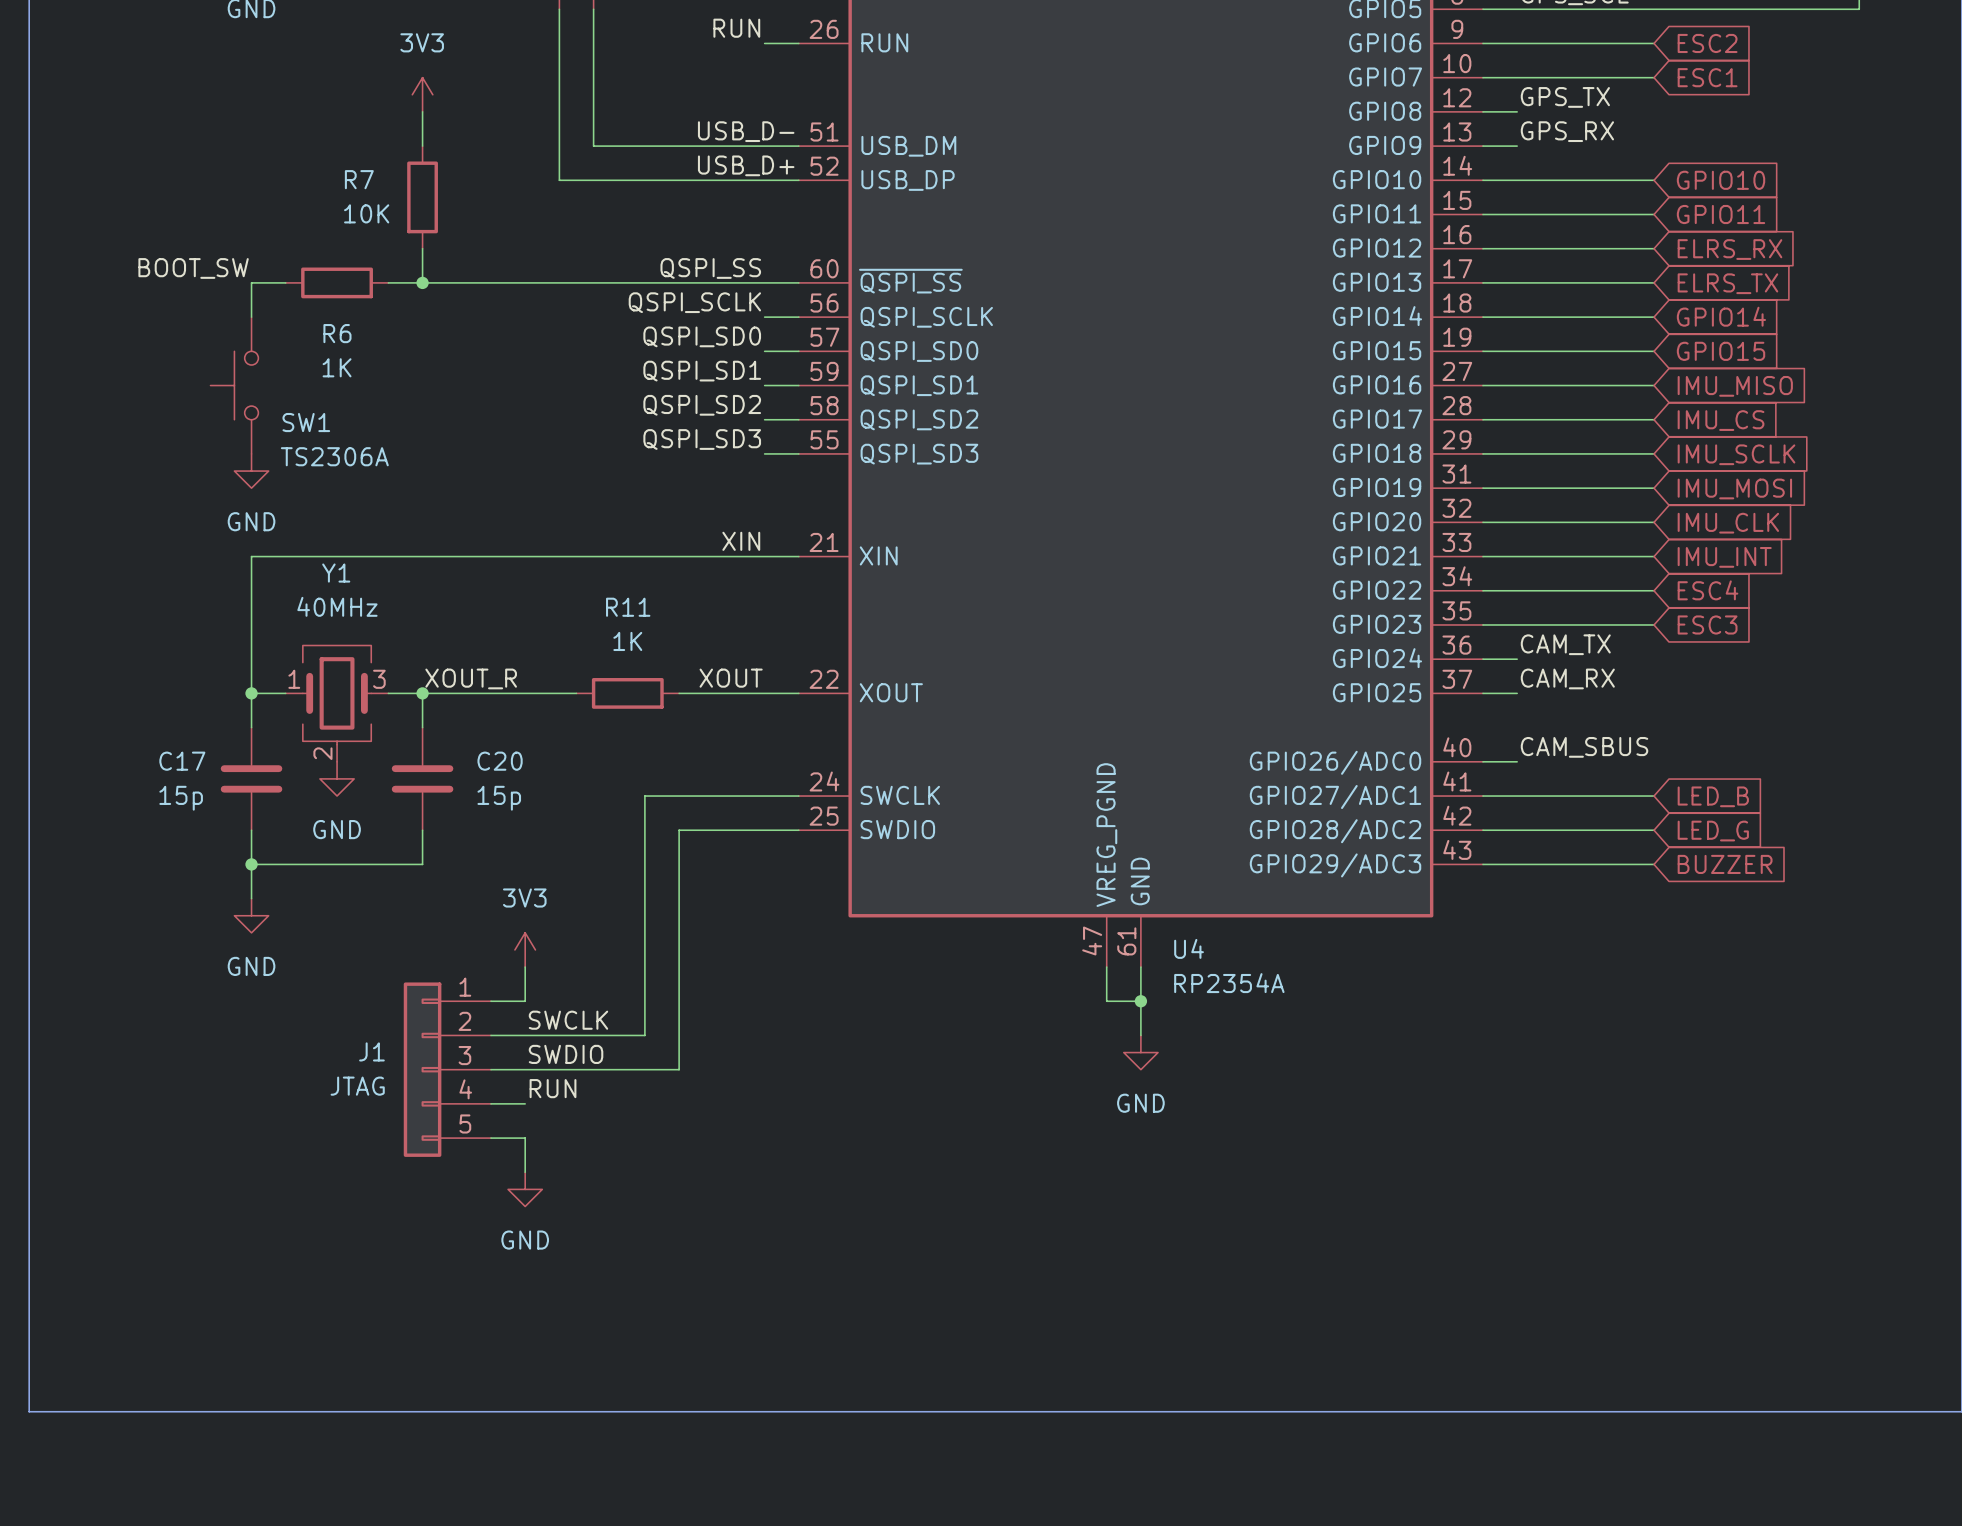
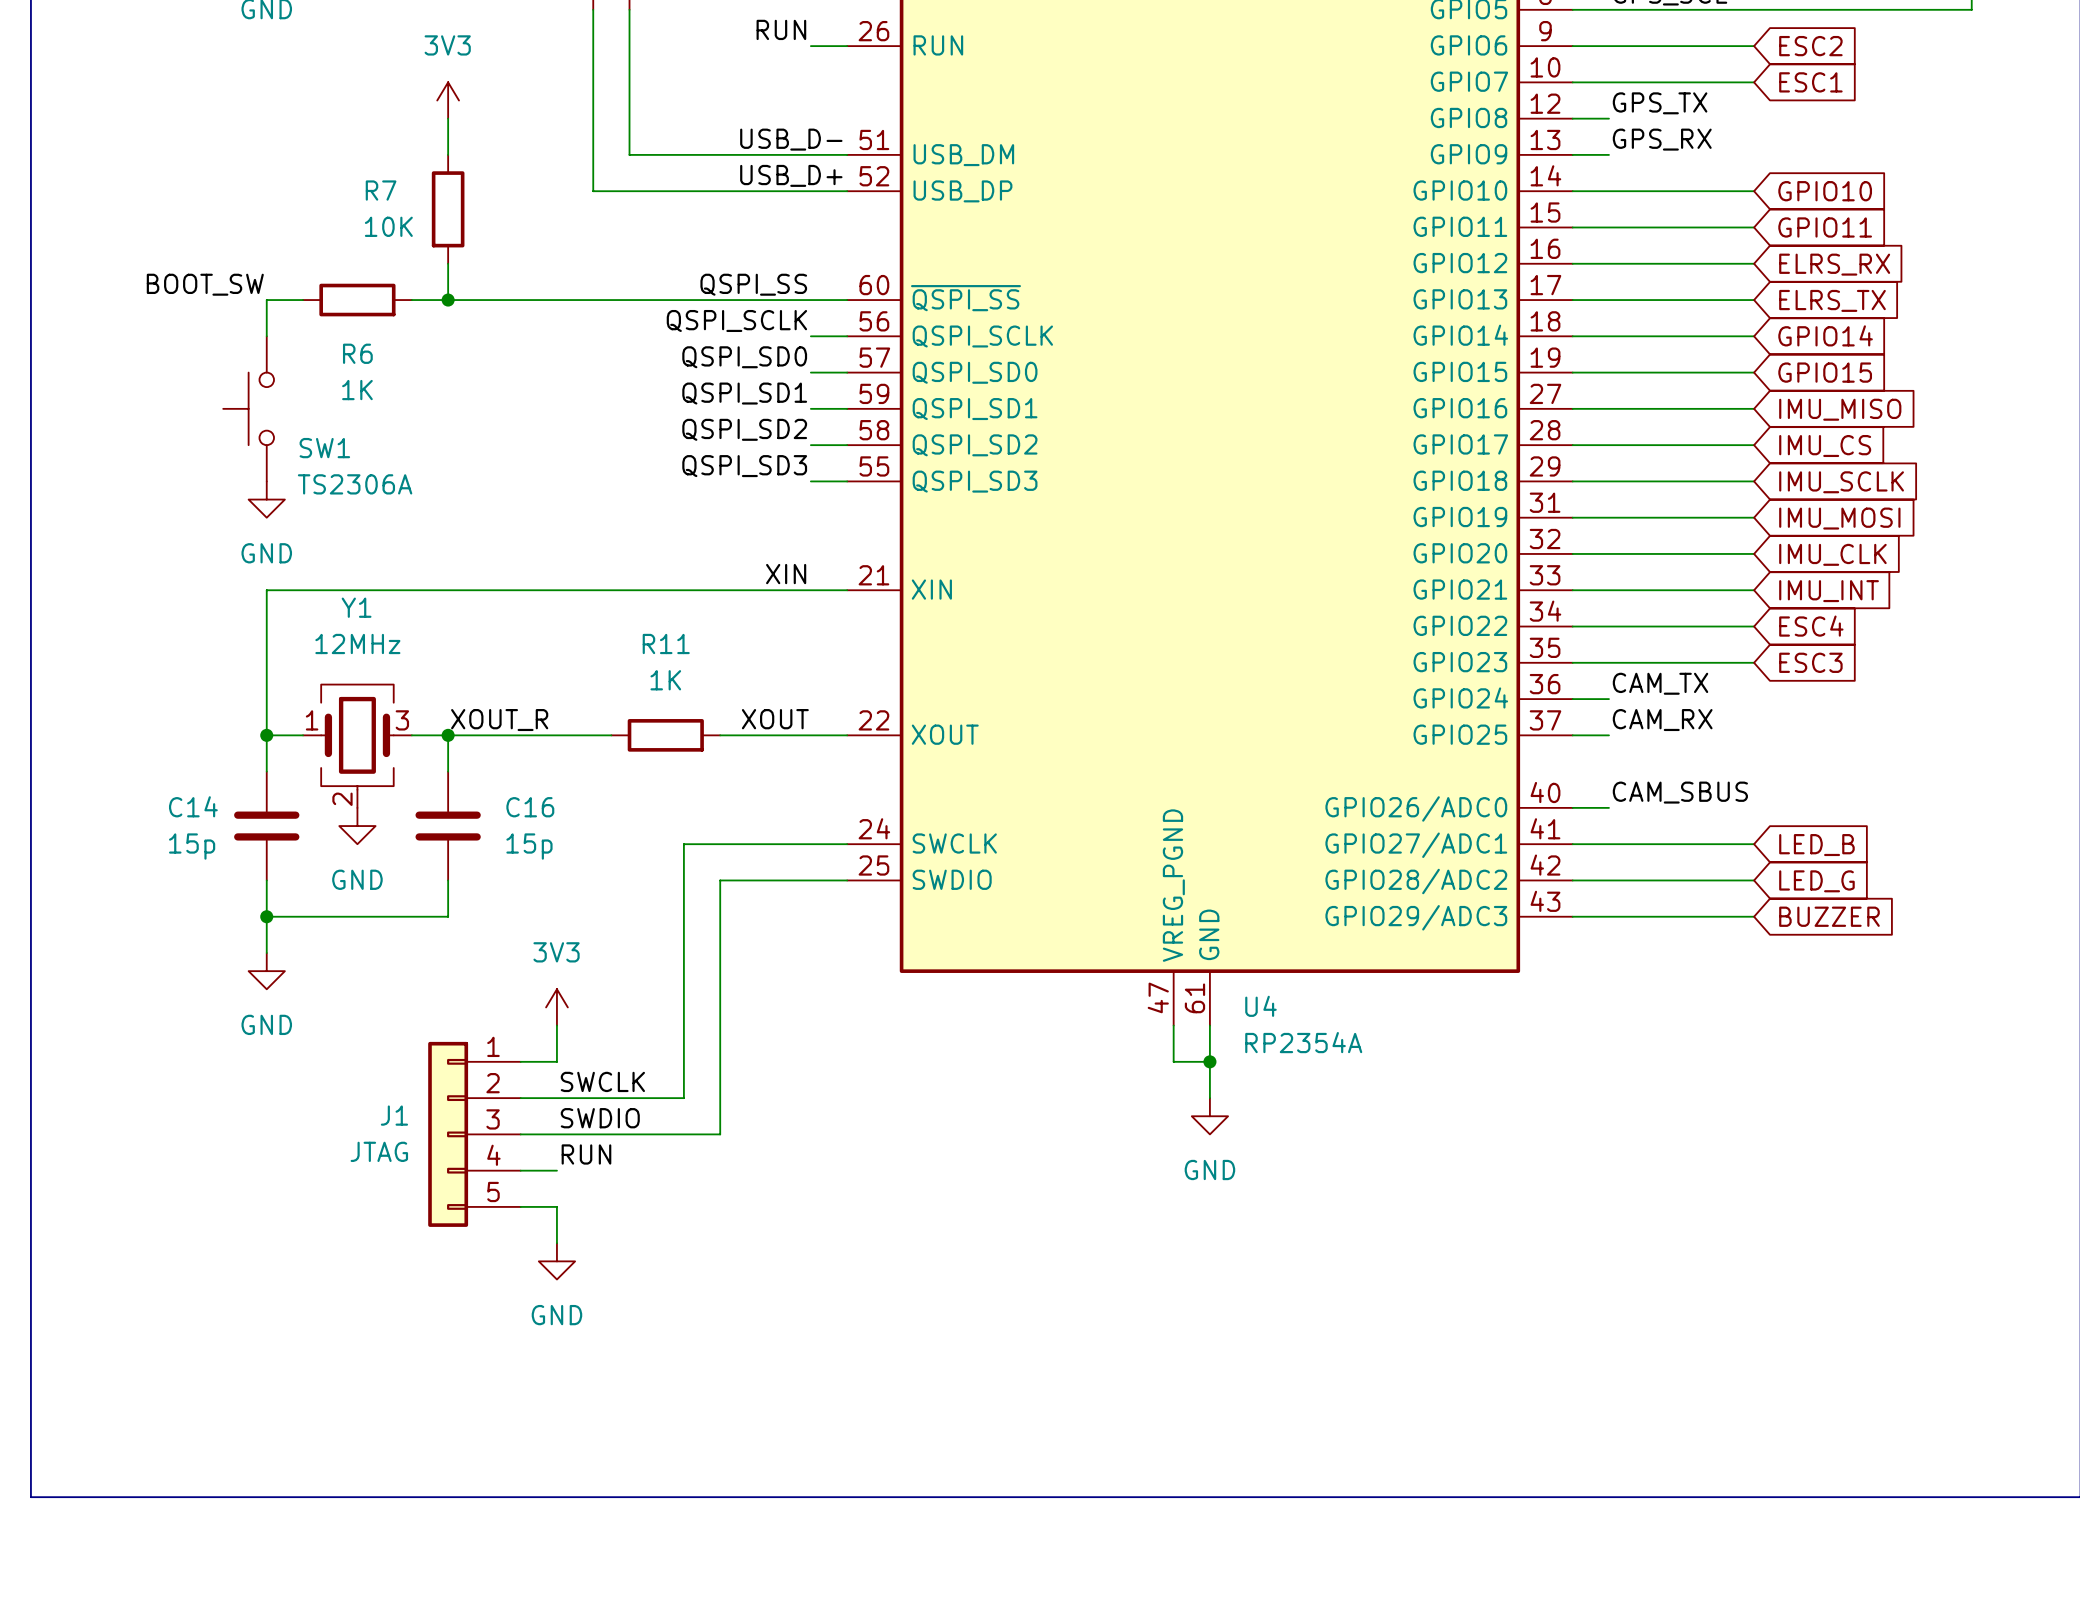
Y1 value: 40MHz (337, 606) -> 12MHz (357, 643)
C17 name: C17 (182, 761) -> C14 (193, 806)
C20 name: C20 (500, 761) -> C16 (530, 807)

